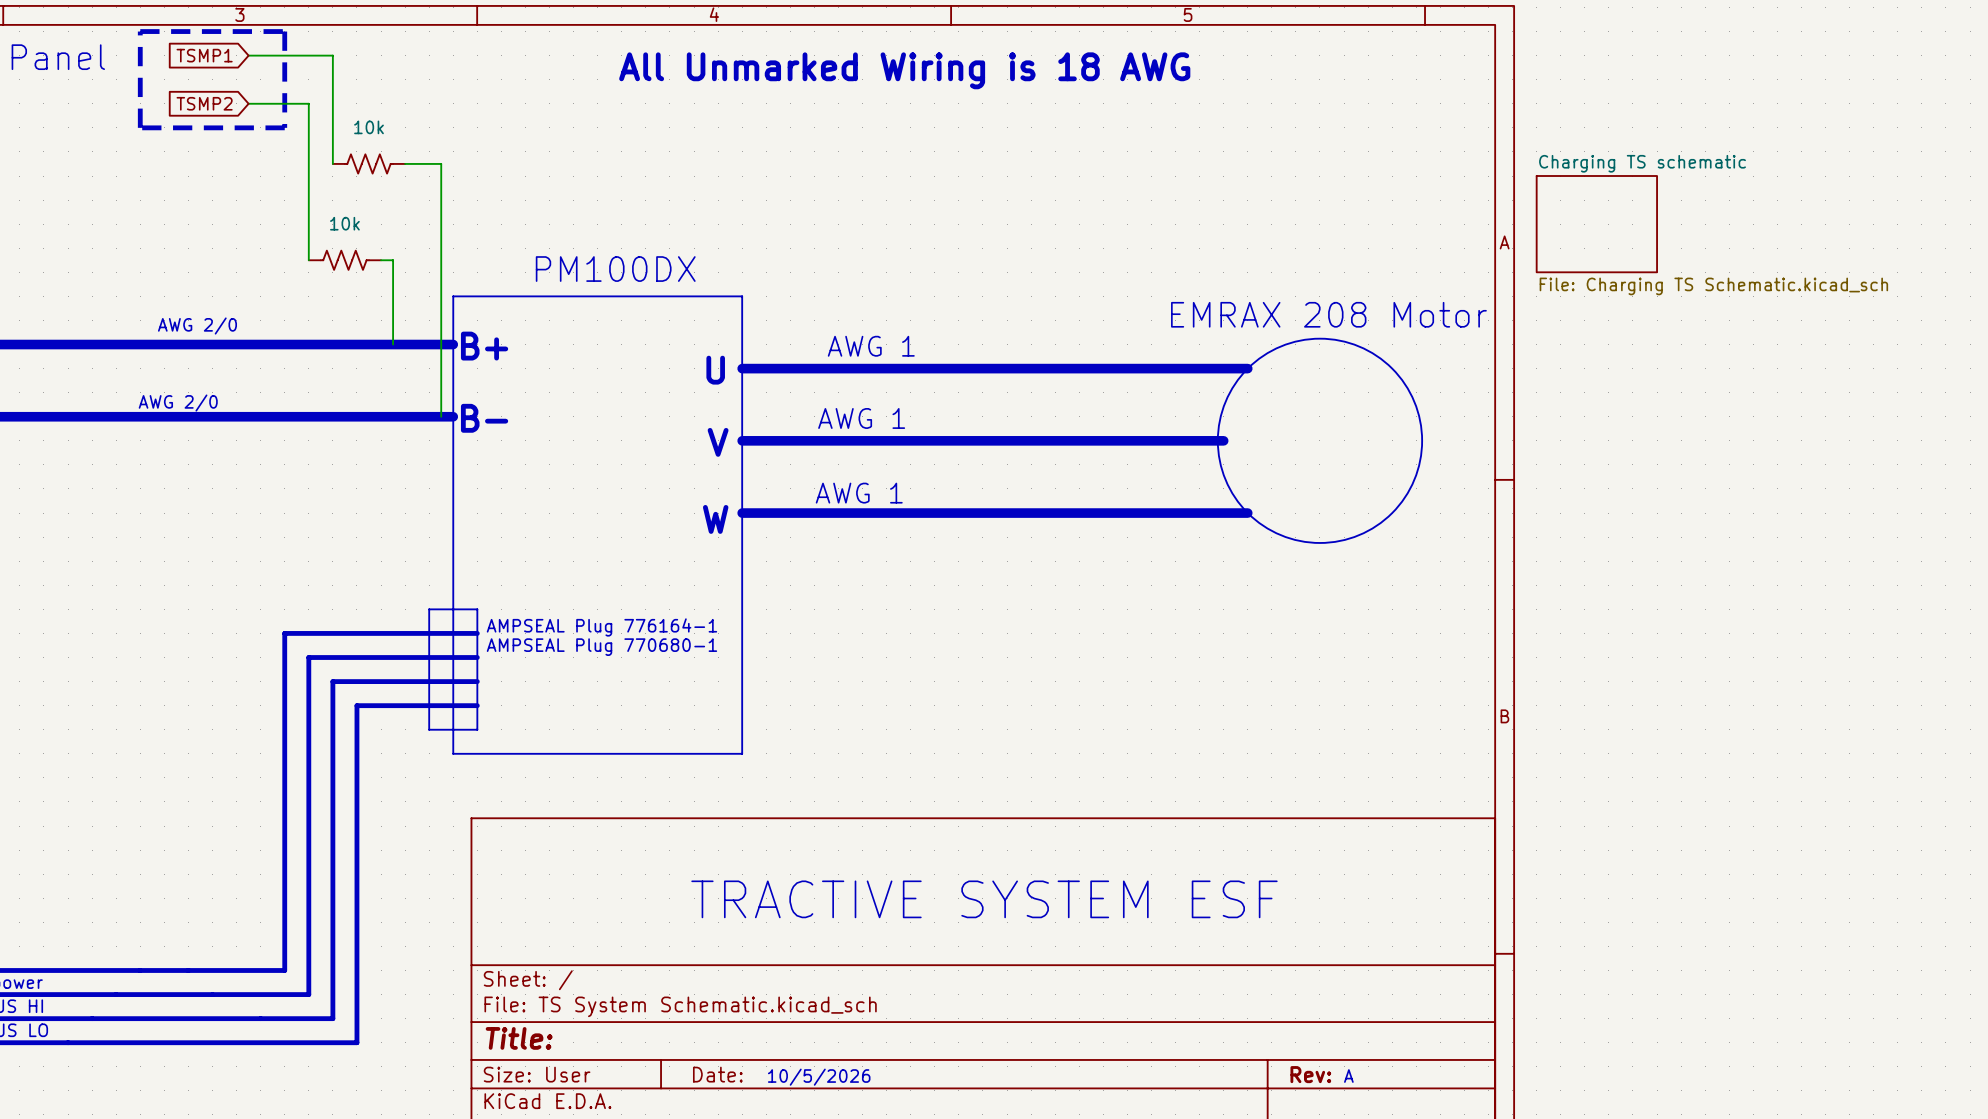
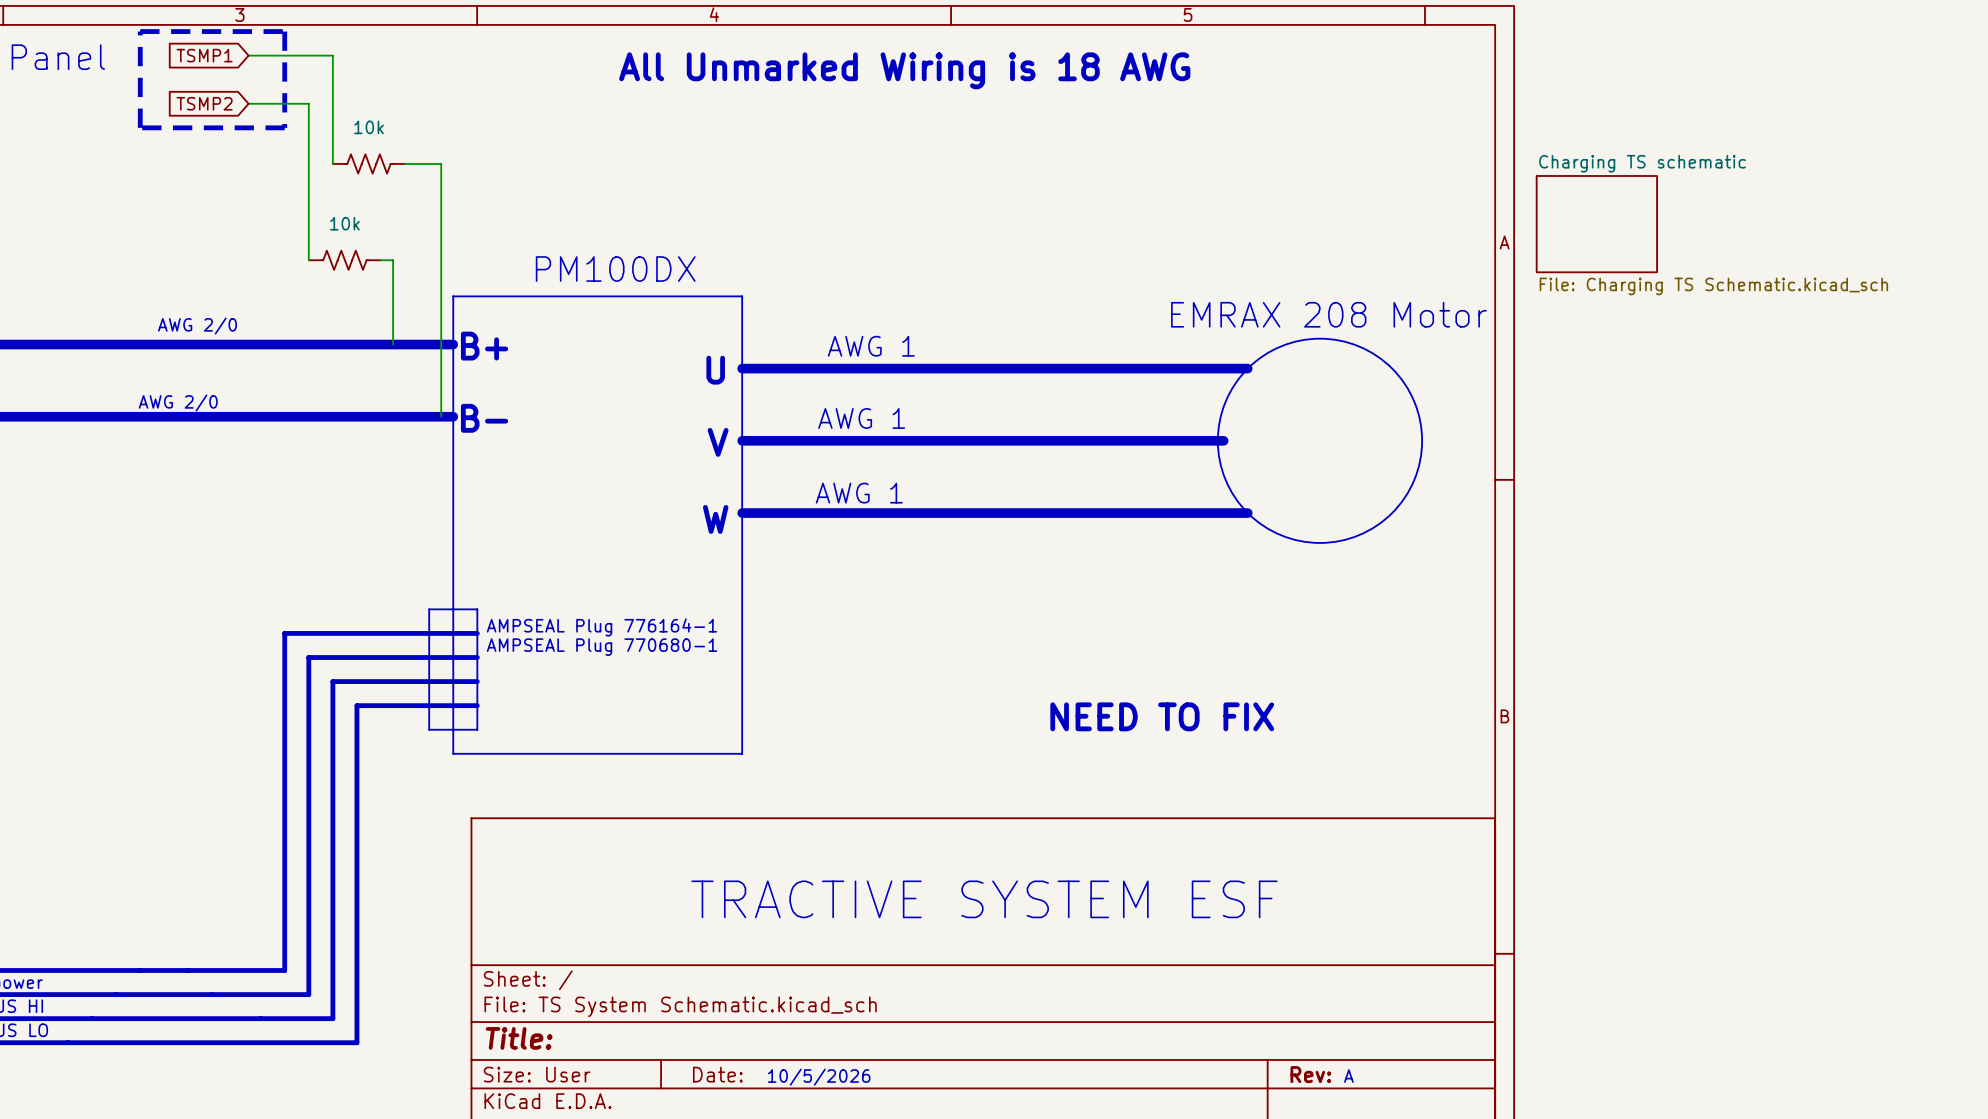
text: none -> NEED TO FIX (1162, 716)

